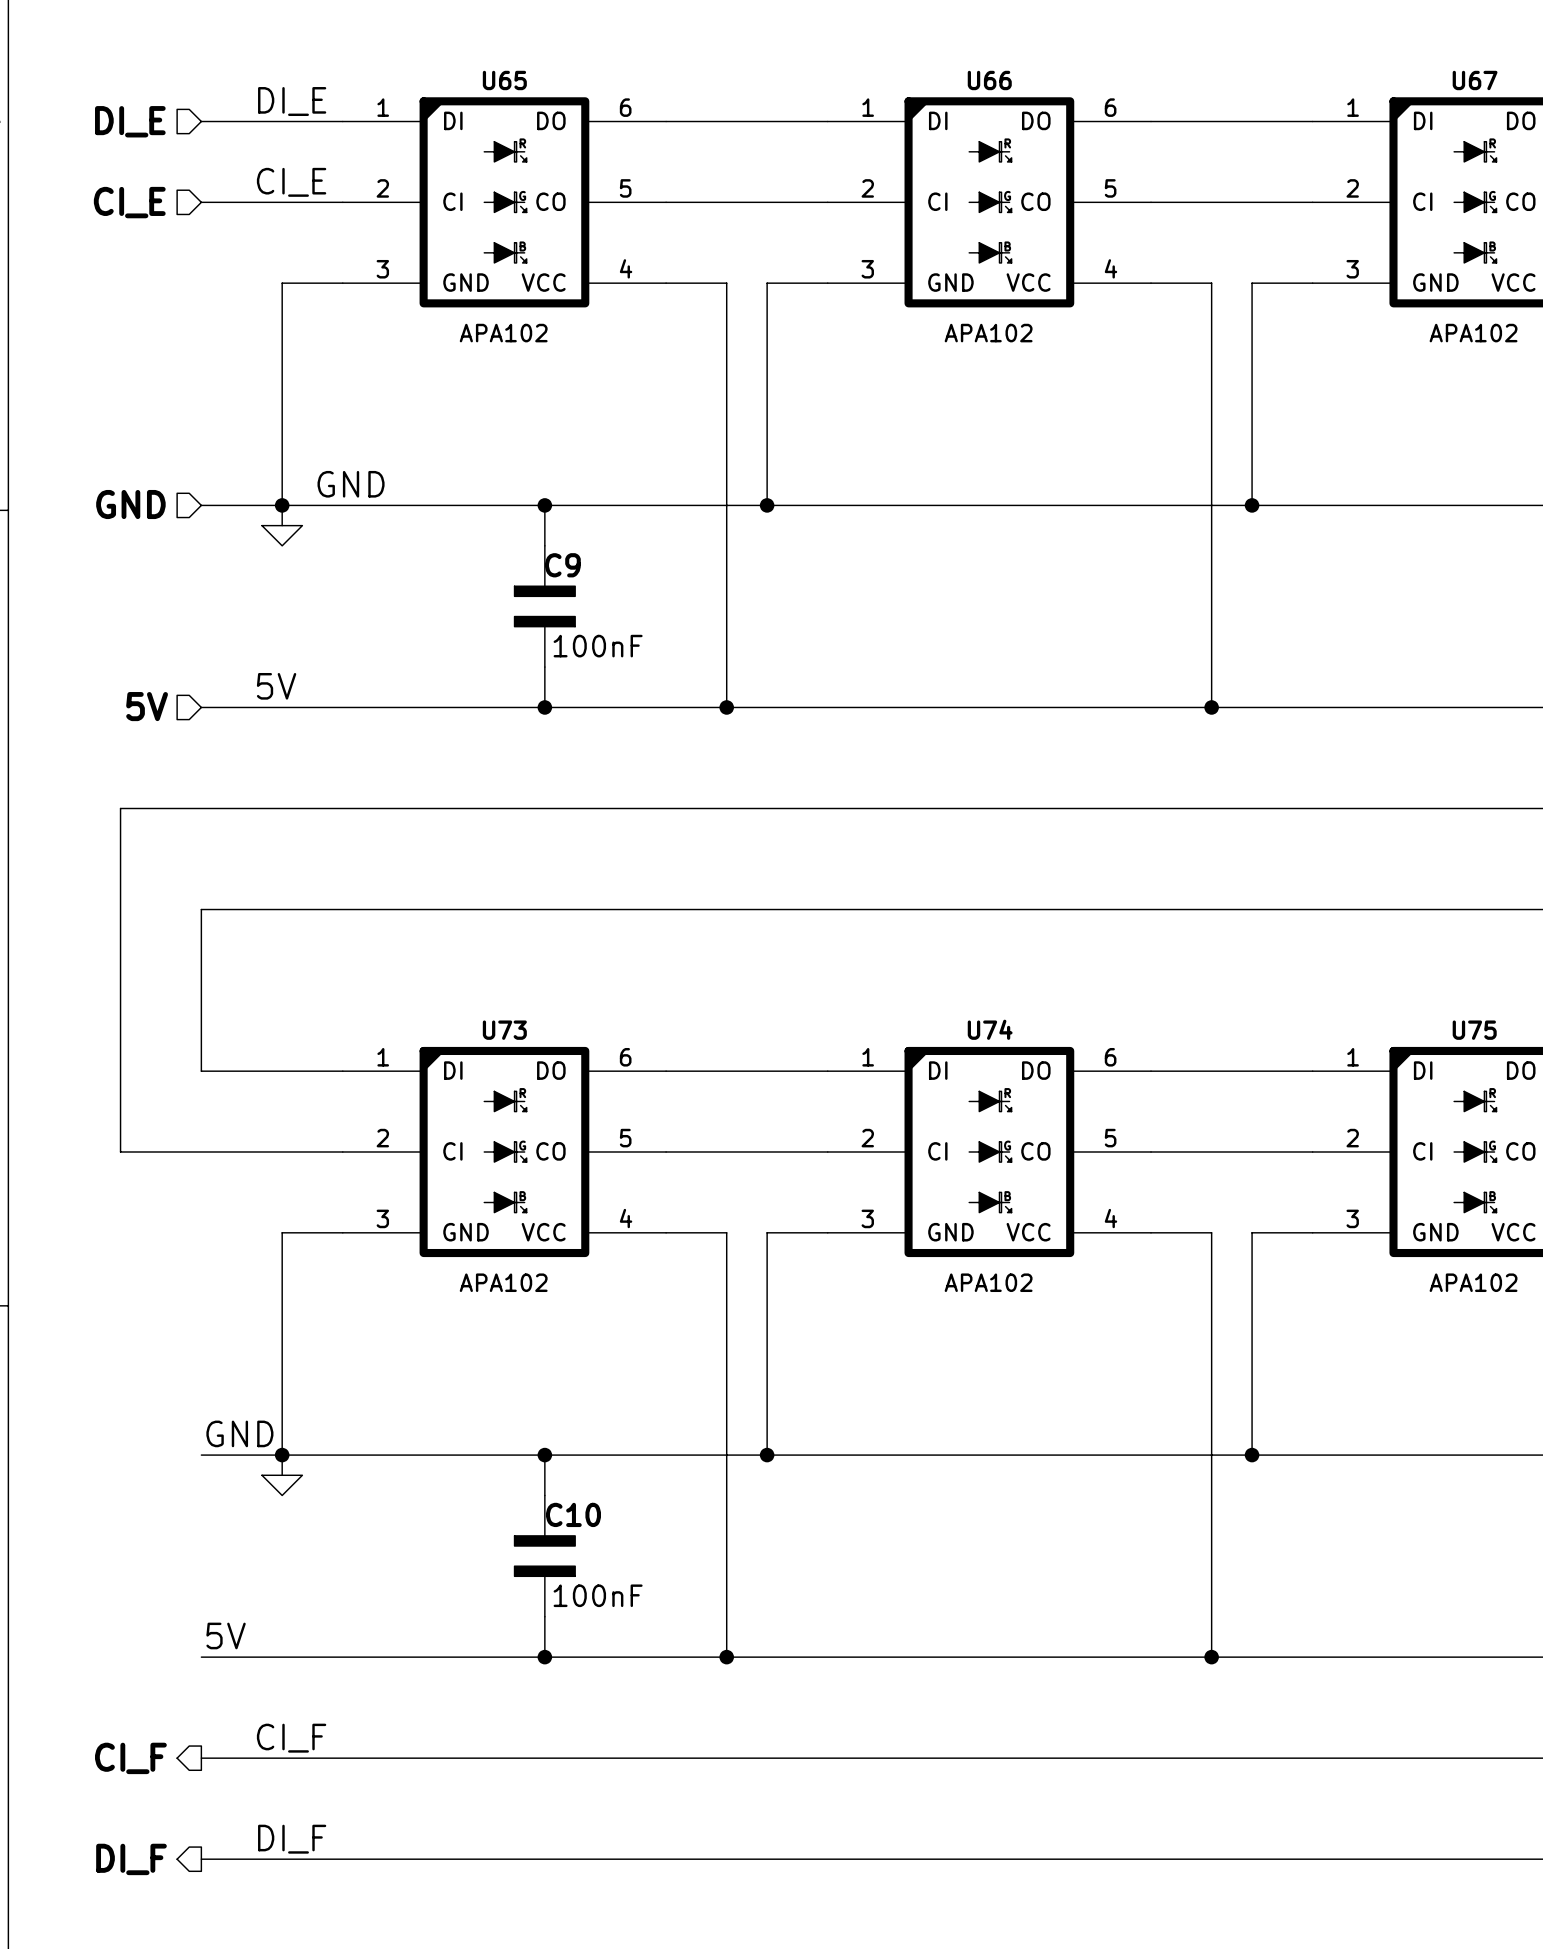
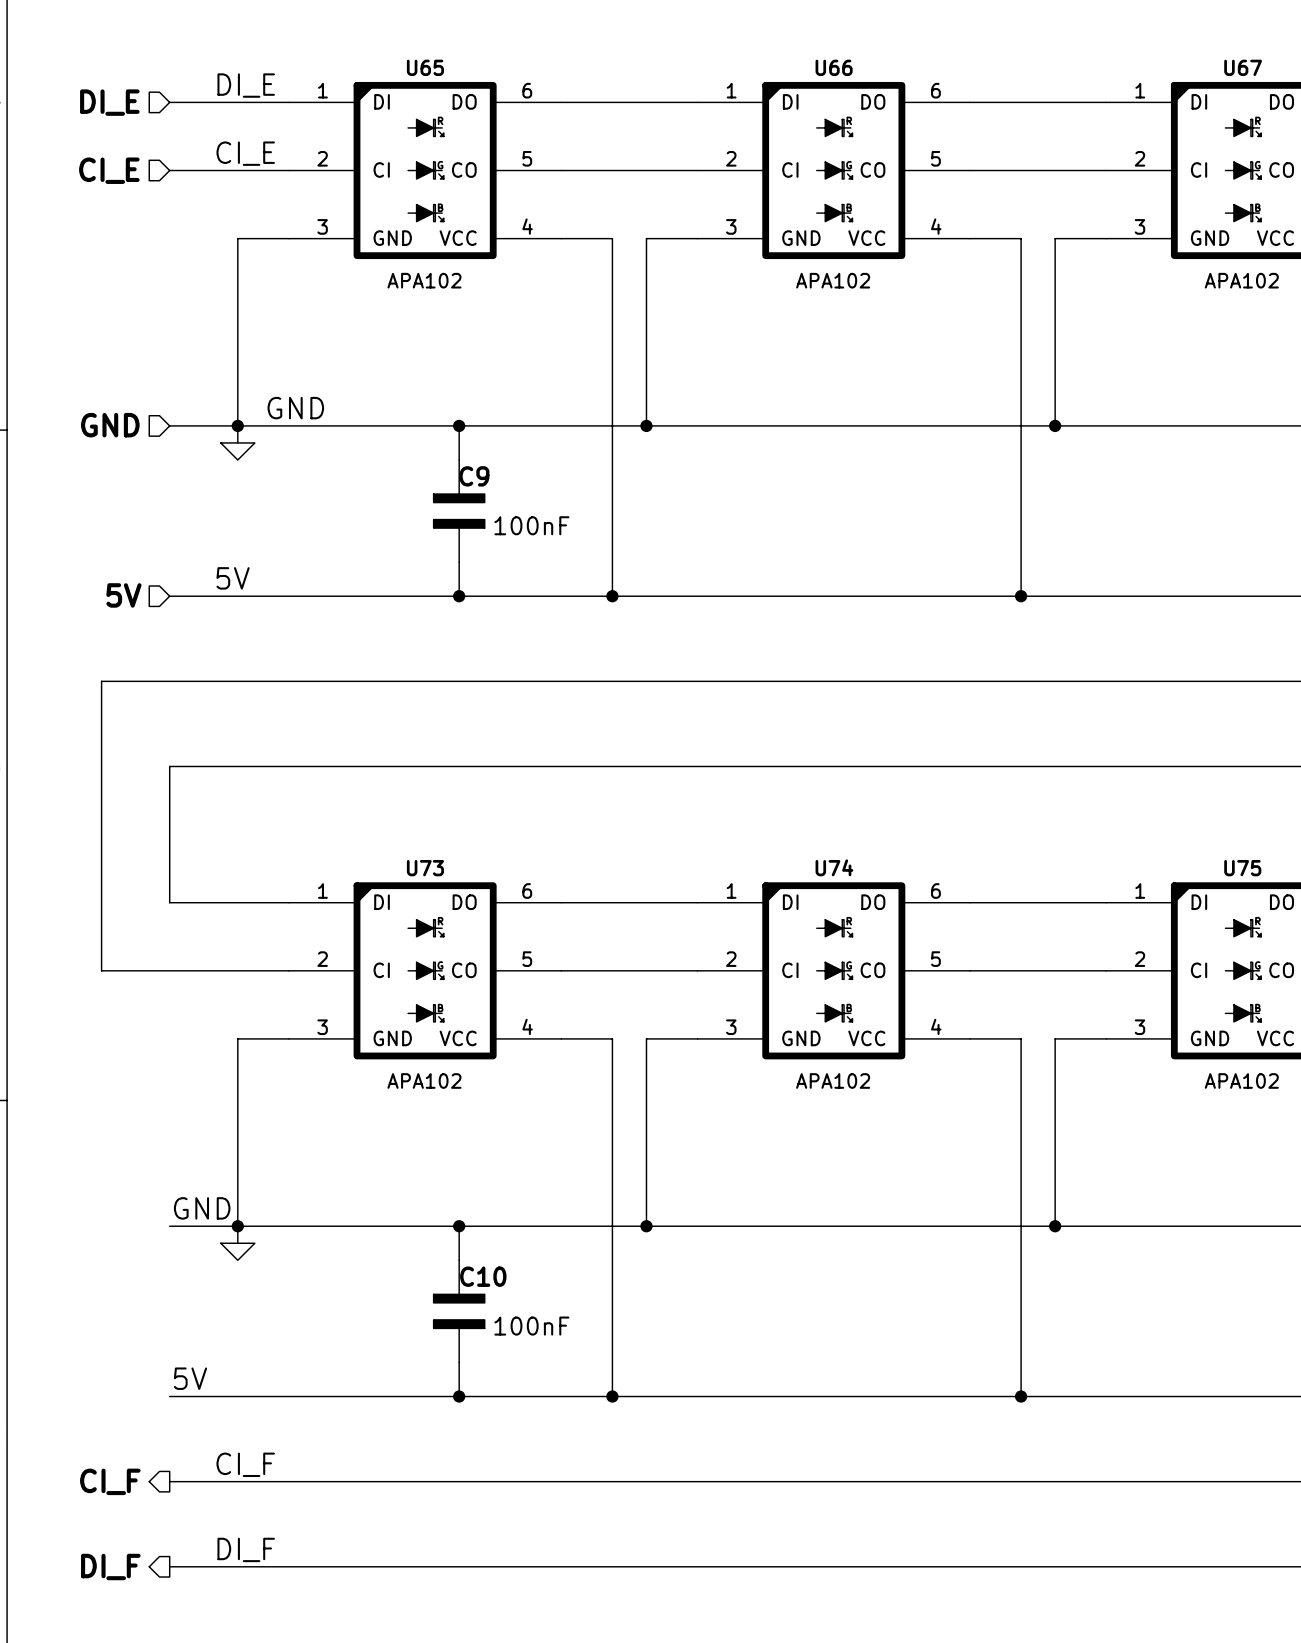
C9 value position: 100nF (598, 646) -> 100nF (531, 525)
C10 value position: 100nF (598, 1595) -> 100nF (531, 1326)

